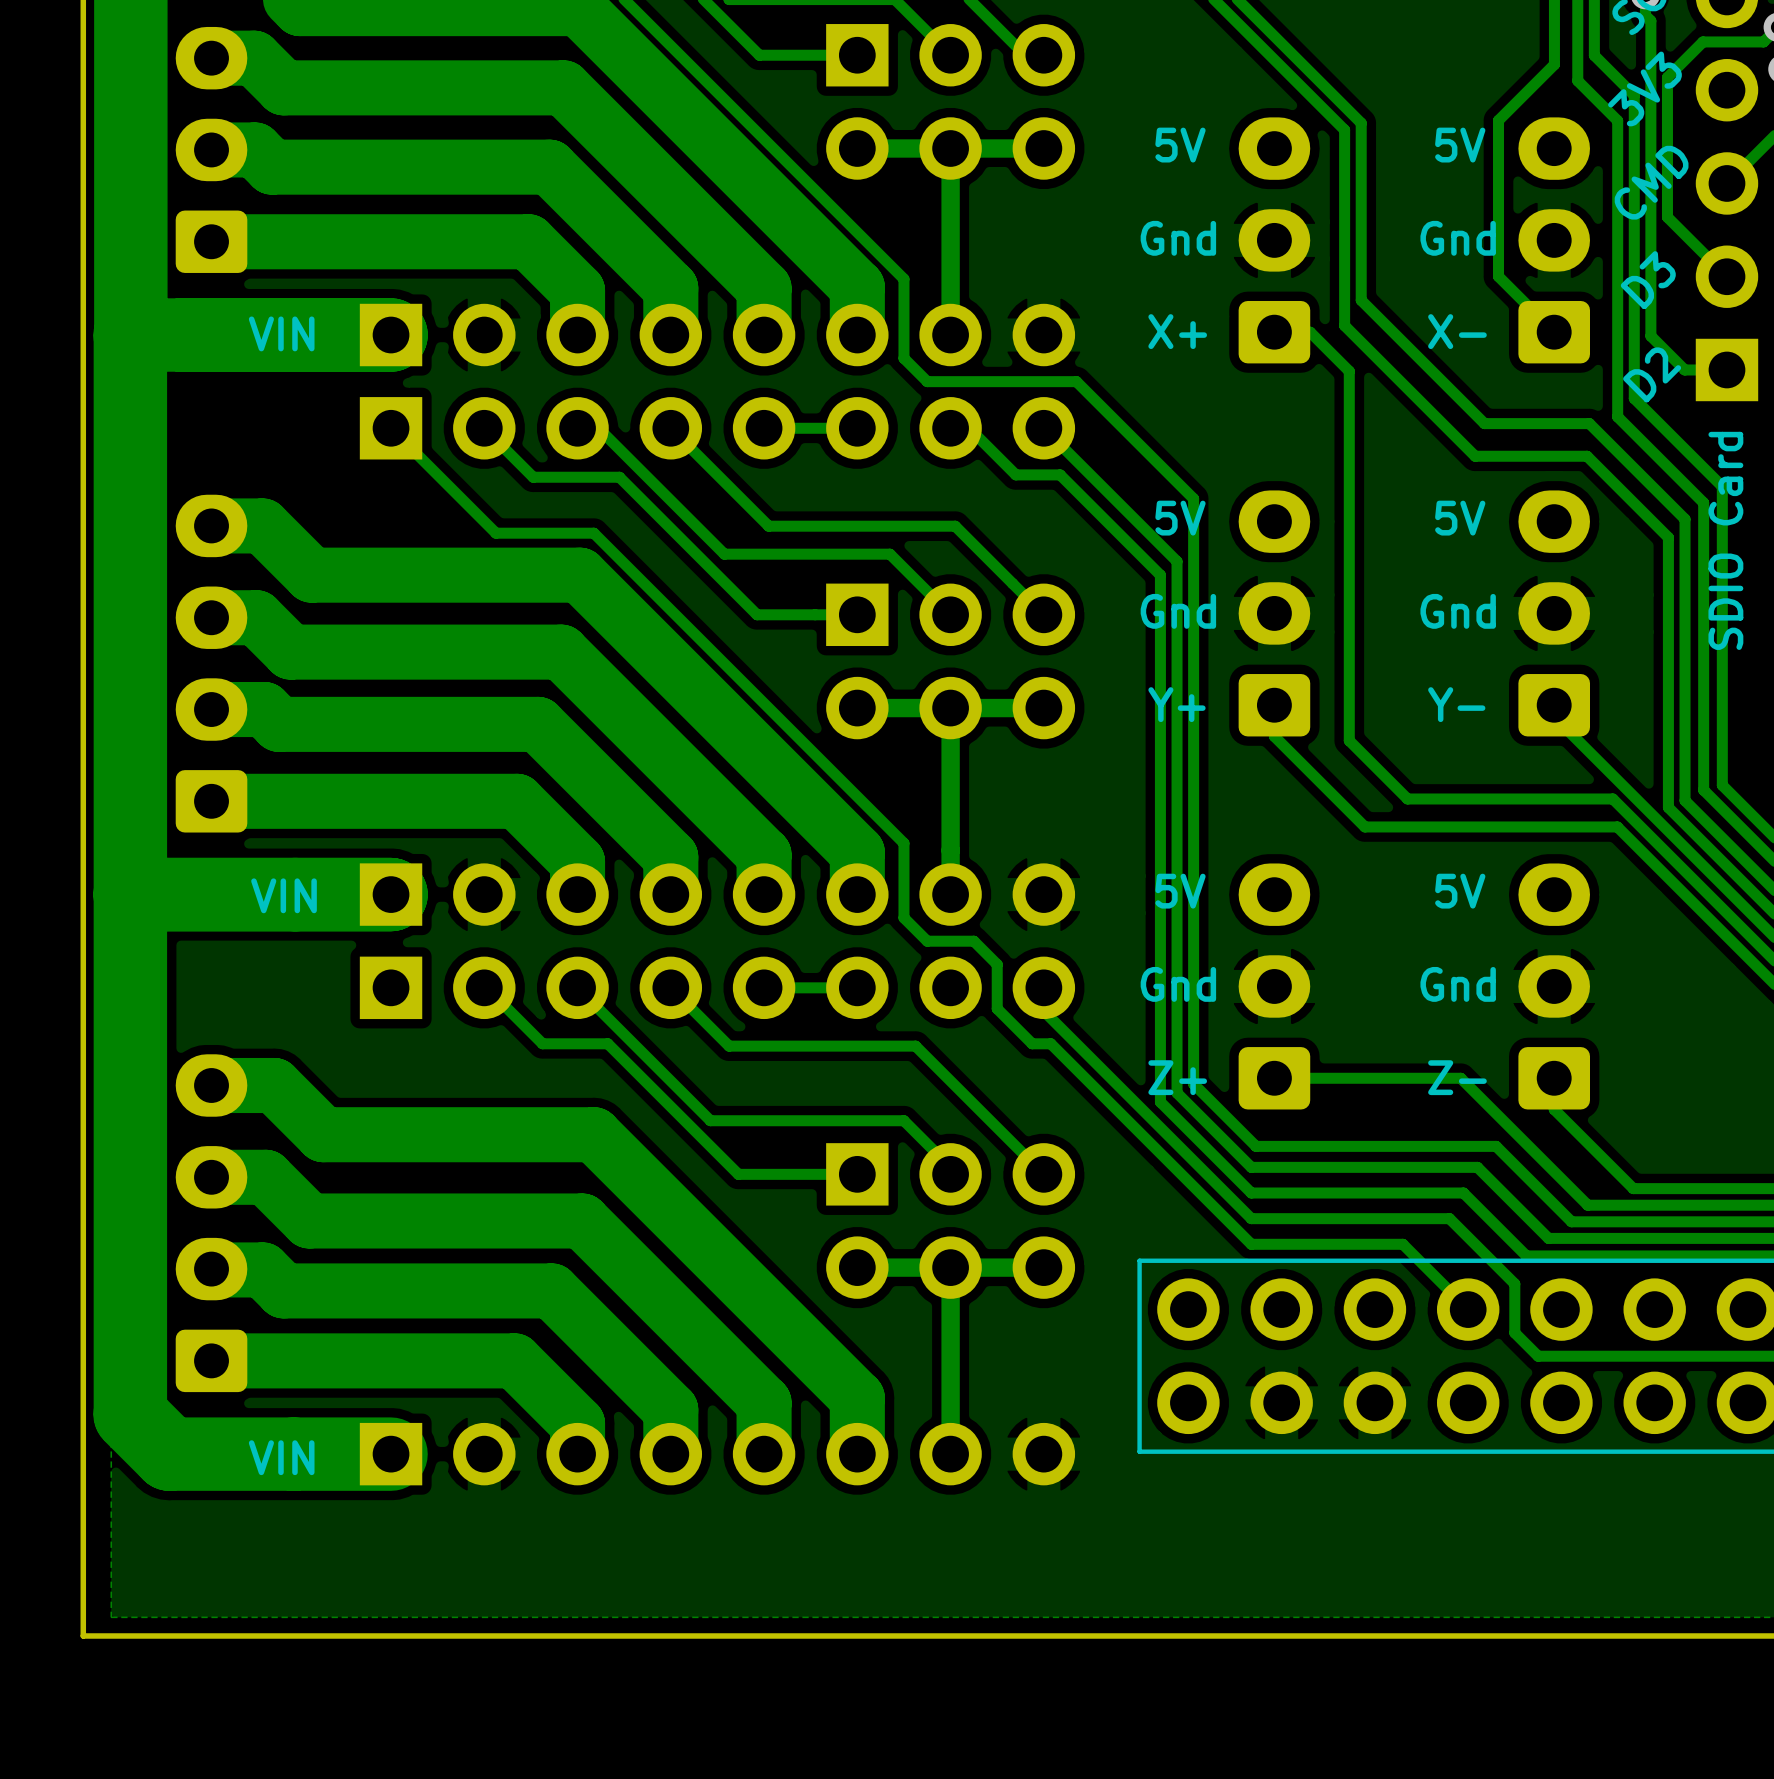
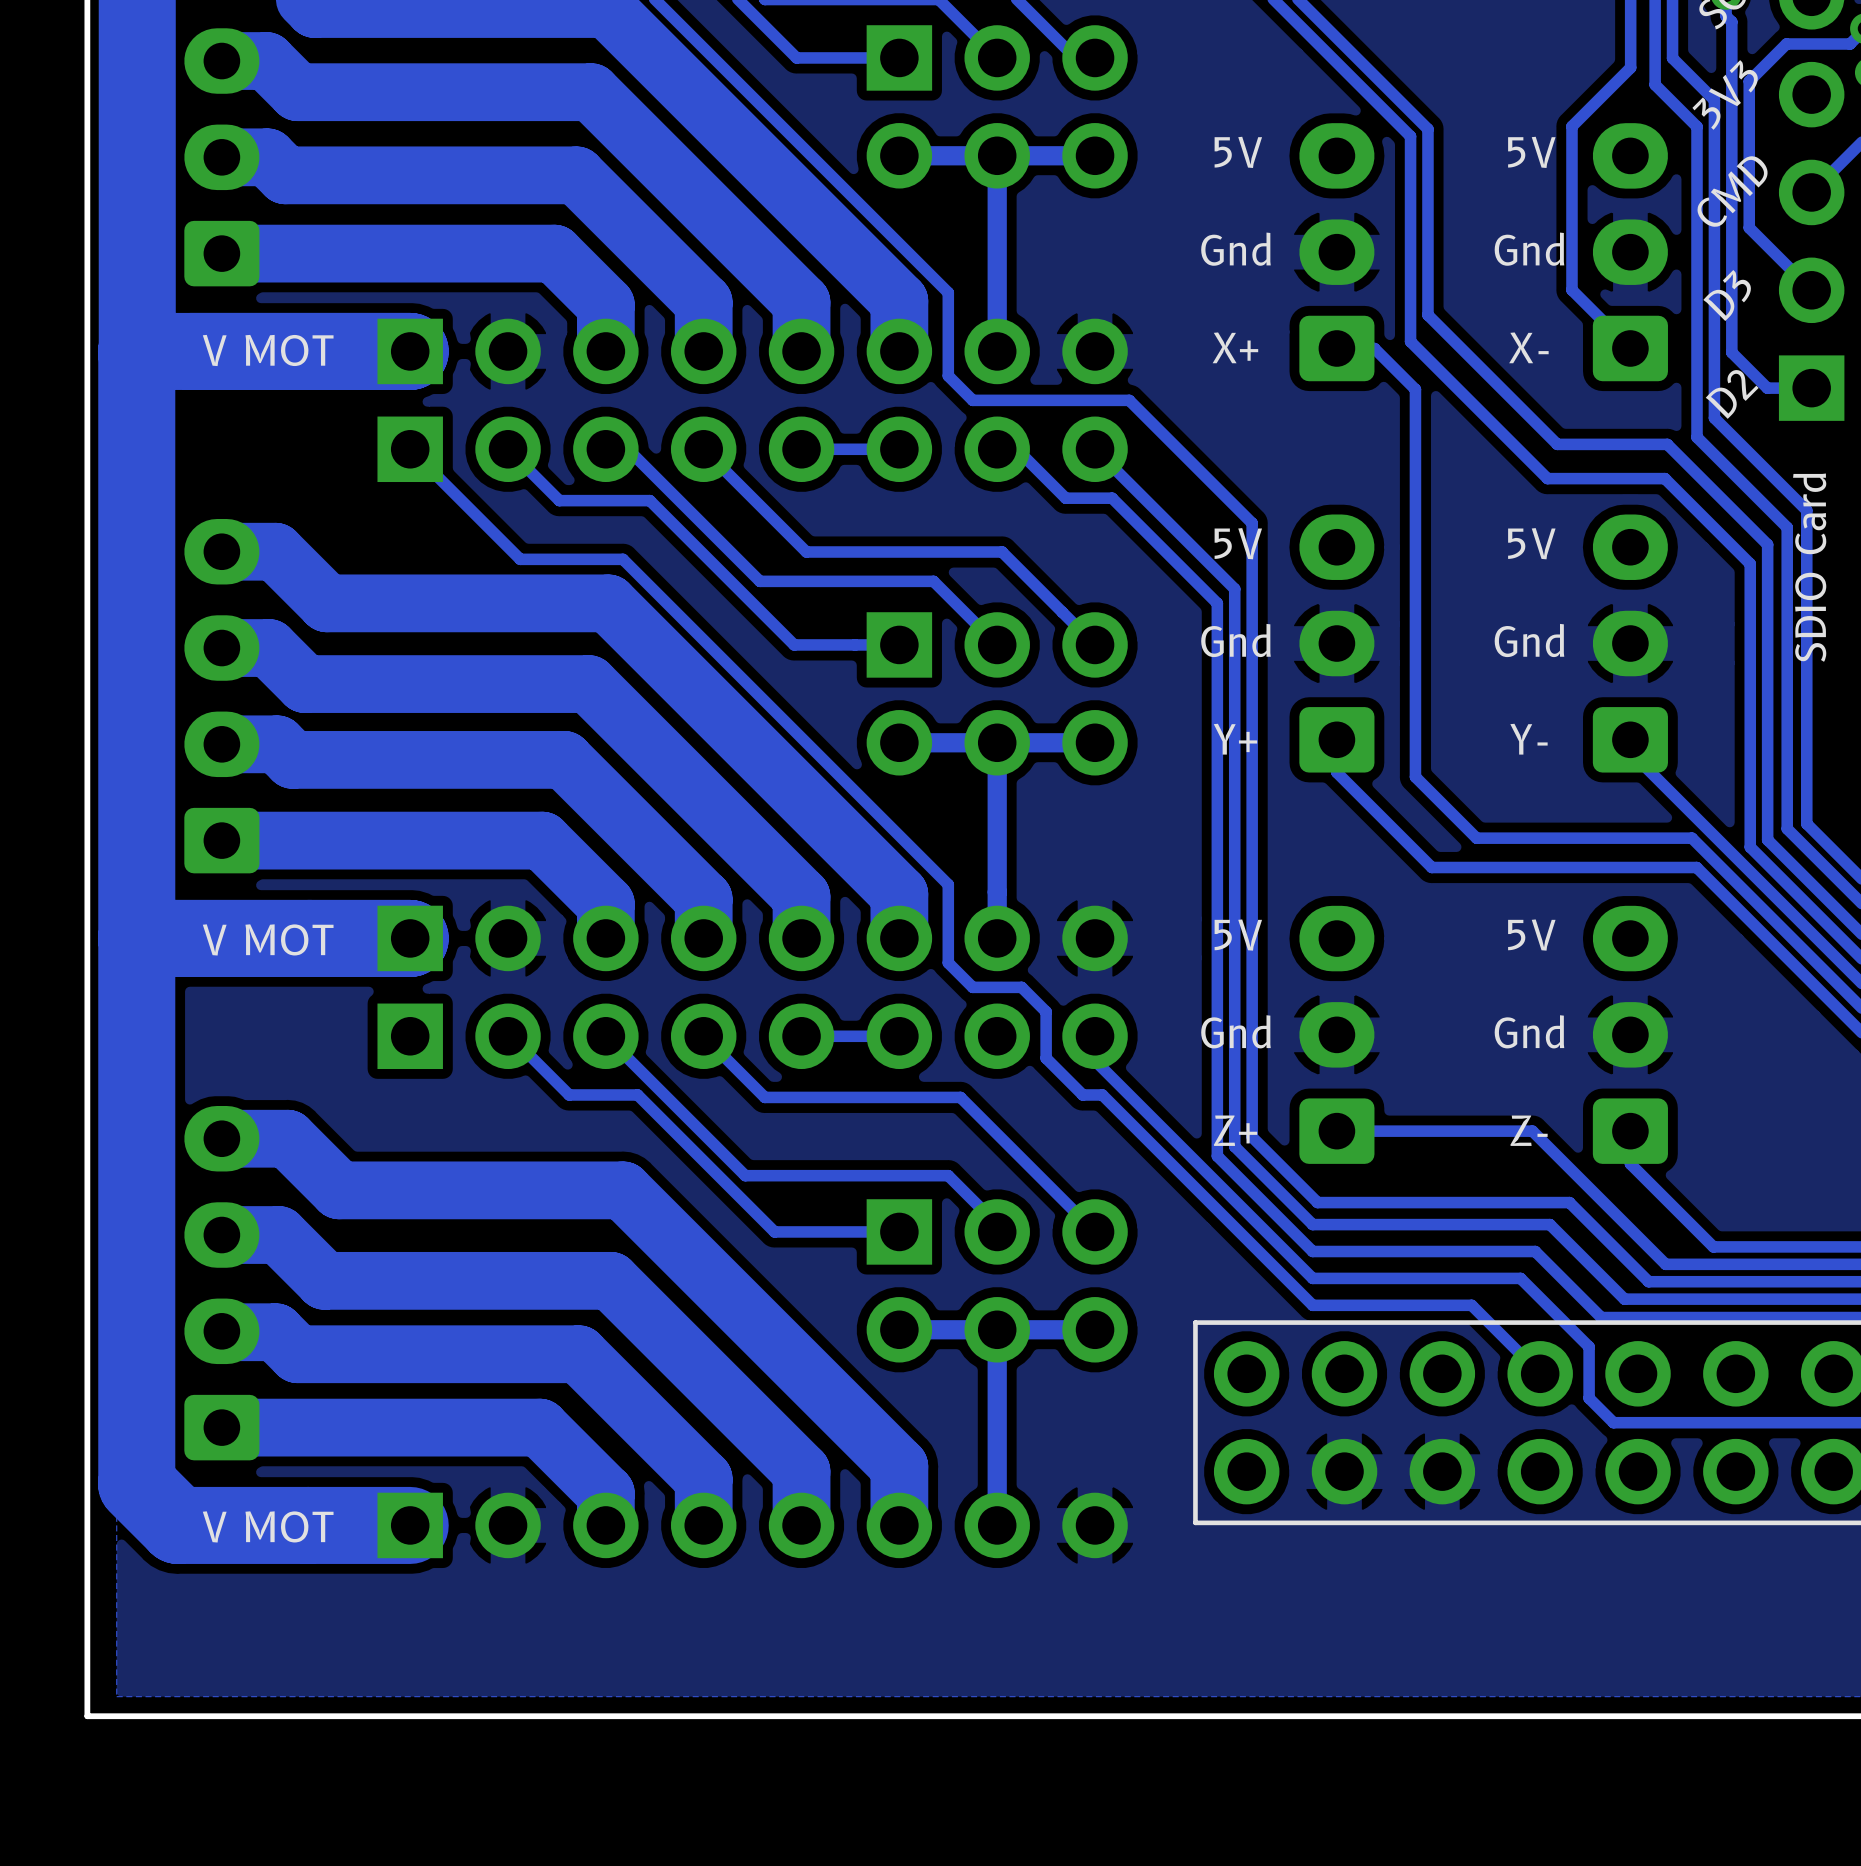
text: VIN (281, 333) -> V MOT (268, 350)
text: VIN (284, 895) -> V MOT (268, 939)
text: VIN (281, 1457) -> V MOT (268, 1526)

